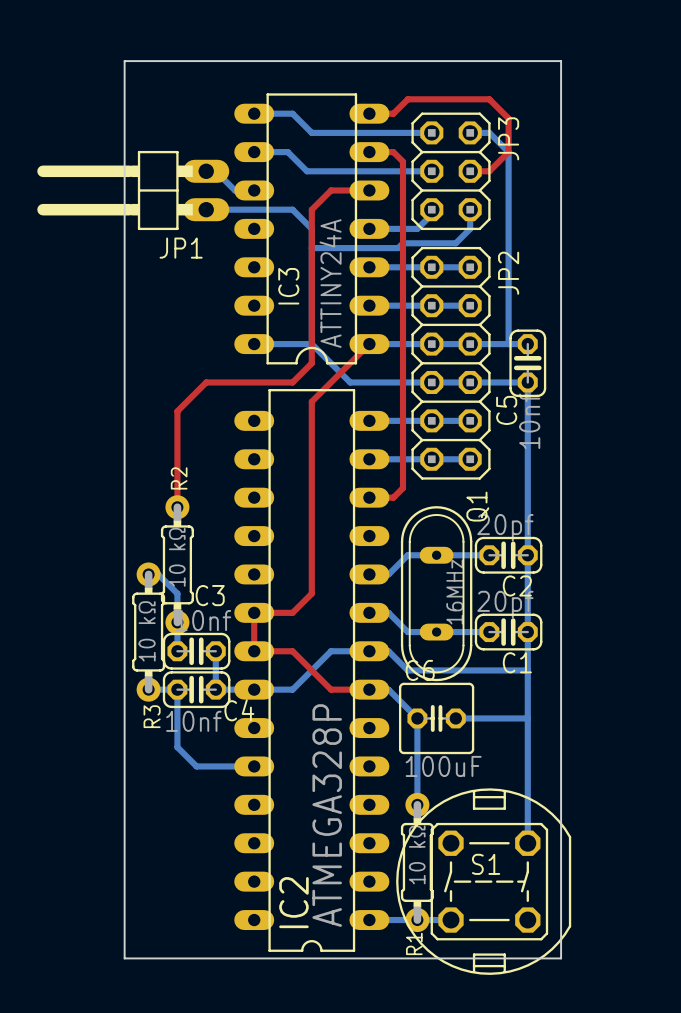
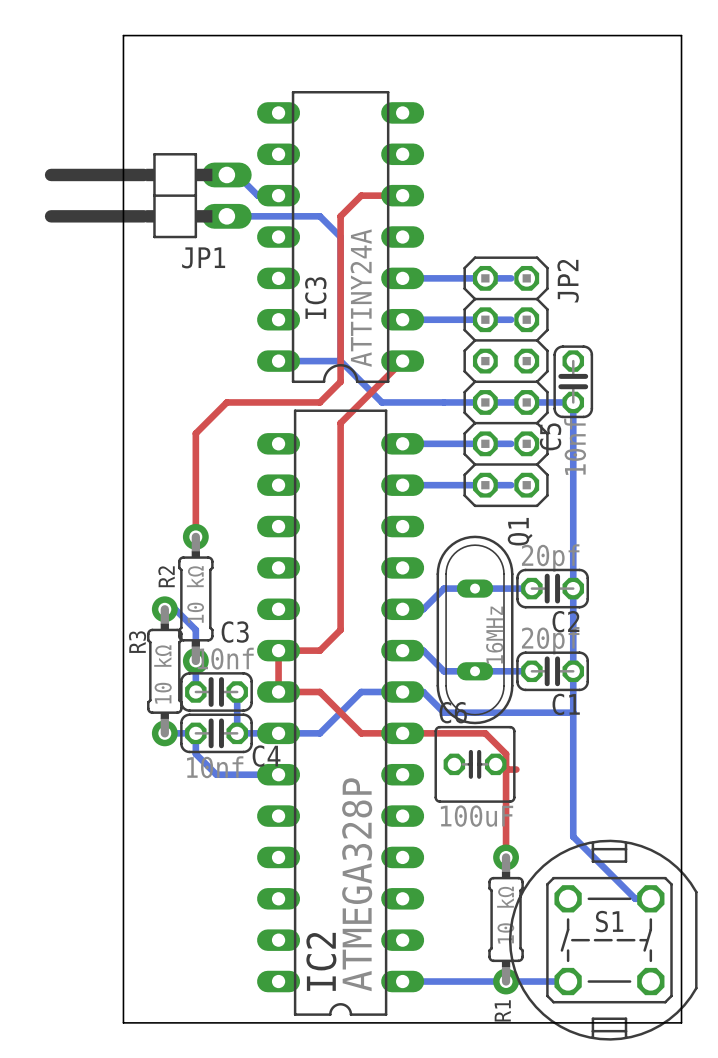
bottom track: (254, 113) (292, 113) (311, 132) (431, 132) -> none
top track: (369, 113) (393, 113) (407, 99) (489, 99) (508, 118) (508, 152) (489, 171) (470, 171) -> none
bottom track: (470, 132) (489, 132) (508, 152) (508, 344) -> none
bottom track: (254, 152) (287, 152) (307, 171) (431, 171) -> none
top track: (369, 152) (393, 152) (403, 161) (403, 488) (393, 497) (369, 497) -> none
JP3: (451, 171) -> none
bottom track: (431, 209) (431, 214) (417, 228) (369, 228) -> none
bottom track: (470, 209) (470, 228) (455, 243) (403, 243) (398, 248) (311, 248) -> none
bottom track: (369, 344) (527, 344) -> none
JP2 position: (451, 363) -> (506, 381)
R2 name position: R2 (179, 478) -> R2 (166, 576)
bottom track: (369, 689) (388, 689) (417, 718) (417, 804) -> none
top track: none -> (402, 733) (485, 733) (506, 754) (506, 857)
bottom track: (177, 708) (177, 747) (196, 766) (254, 766) -> (195, 754) (216, 774) (278, 774)
R3 name position: R3 (152, 716) -> R3 (137, 642)
bottom track: (455, 718) (527, 718) -> (490, 981) (568, 981)
top track: none -> (506, 769) (516, 769)
bottom track: (527, 785) (527, 843) -> (573, 836) (635, 898) (650, 898)
R1 position: (417, 862) -> (506, 919)
S1 position: (483, 881) -> (603, 940)
board edge: (124, 958) (124, 61) (561, 61) (561, 958) -> (138, 1022) (123, 1022) (123, 35) (681, 35) (681, 1022) (609, 1022)

